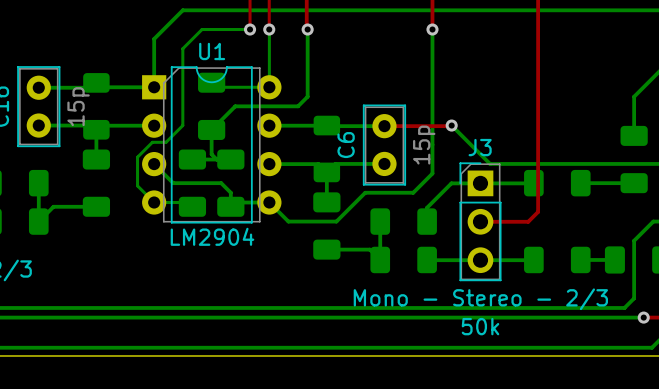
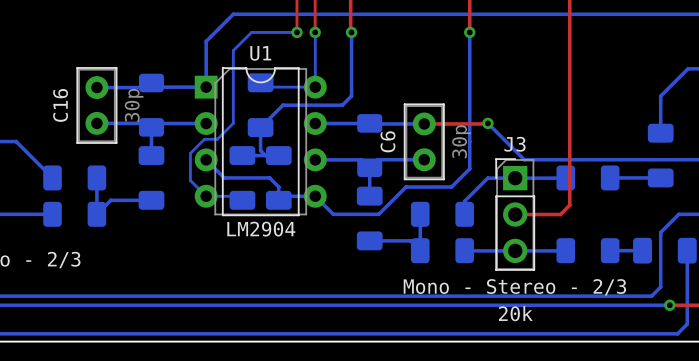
C16 value: 15p (78, 106) -> 30p (134, 105)
C6 value: 15p (424, 145) -> 30p (461, 141)
J3 value: 50k (480, 326) -> 20k (515, 313)

